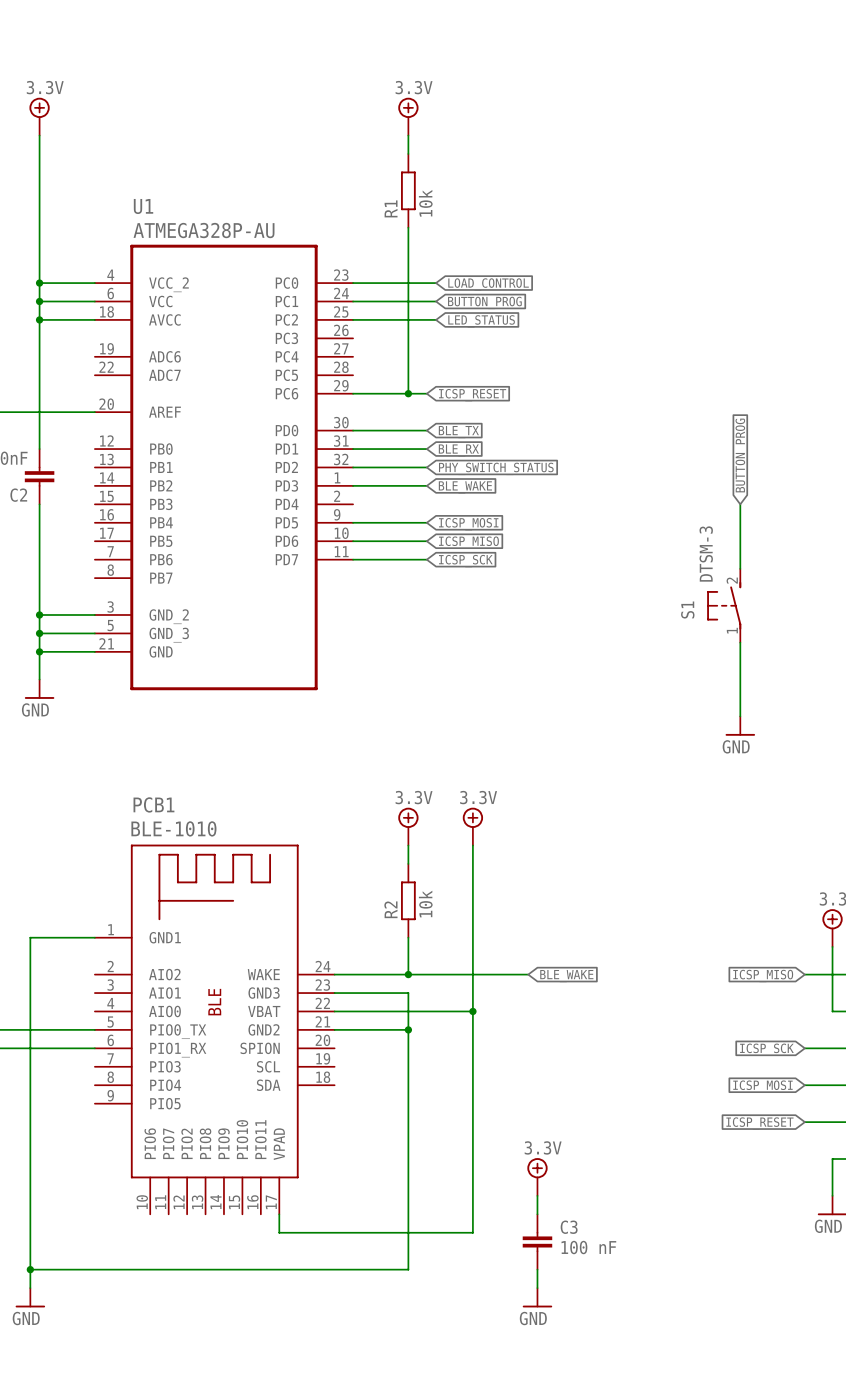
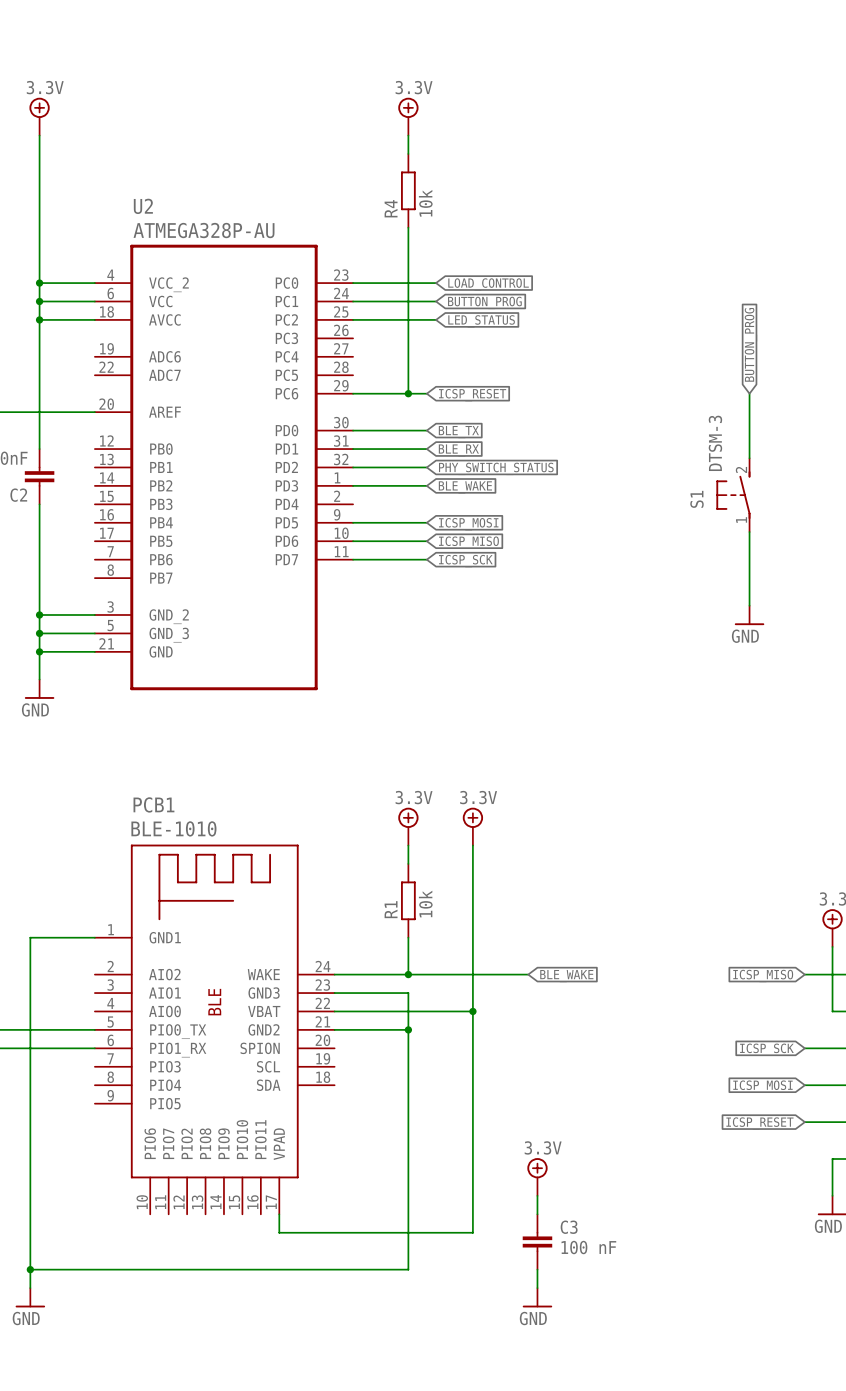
U1 name: U1 (143, 206) -> U2 (143, 206)
R1 name: R1 (391, 208) -> R4 (391, 208)
global label position: BUTTON_PROG (741, 455) -> BUTTON_PROG (750, 344)
wire: (740, 504) (740, 568) -> (749, 393) (749, 458)
S1 position: (724, 605) -> (733, 495)
wire: (740, 642) (740, 716) -> (749, 532) (749, 605)
power symbol position: GND (740, 726) -> GND (749, 615)
R2 name: R2 (390, 909) -> R1 (391, 909)

